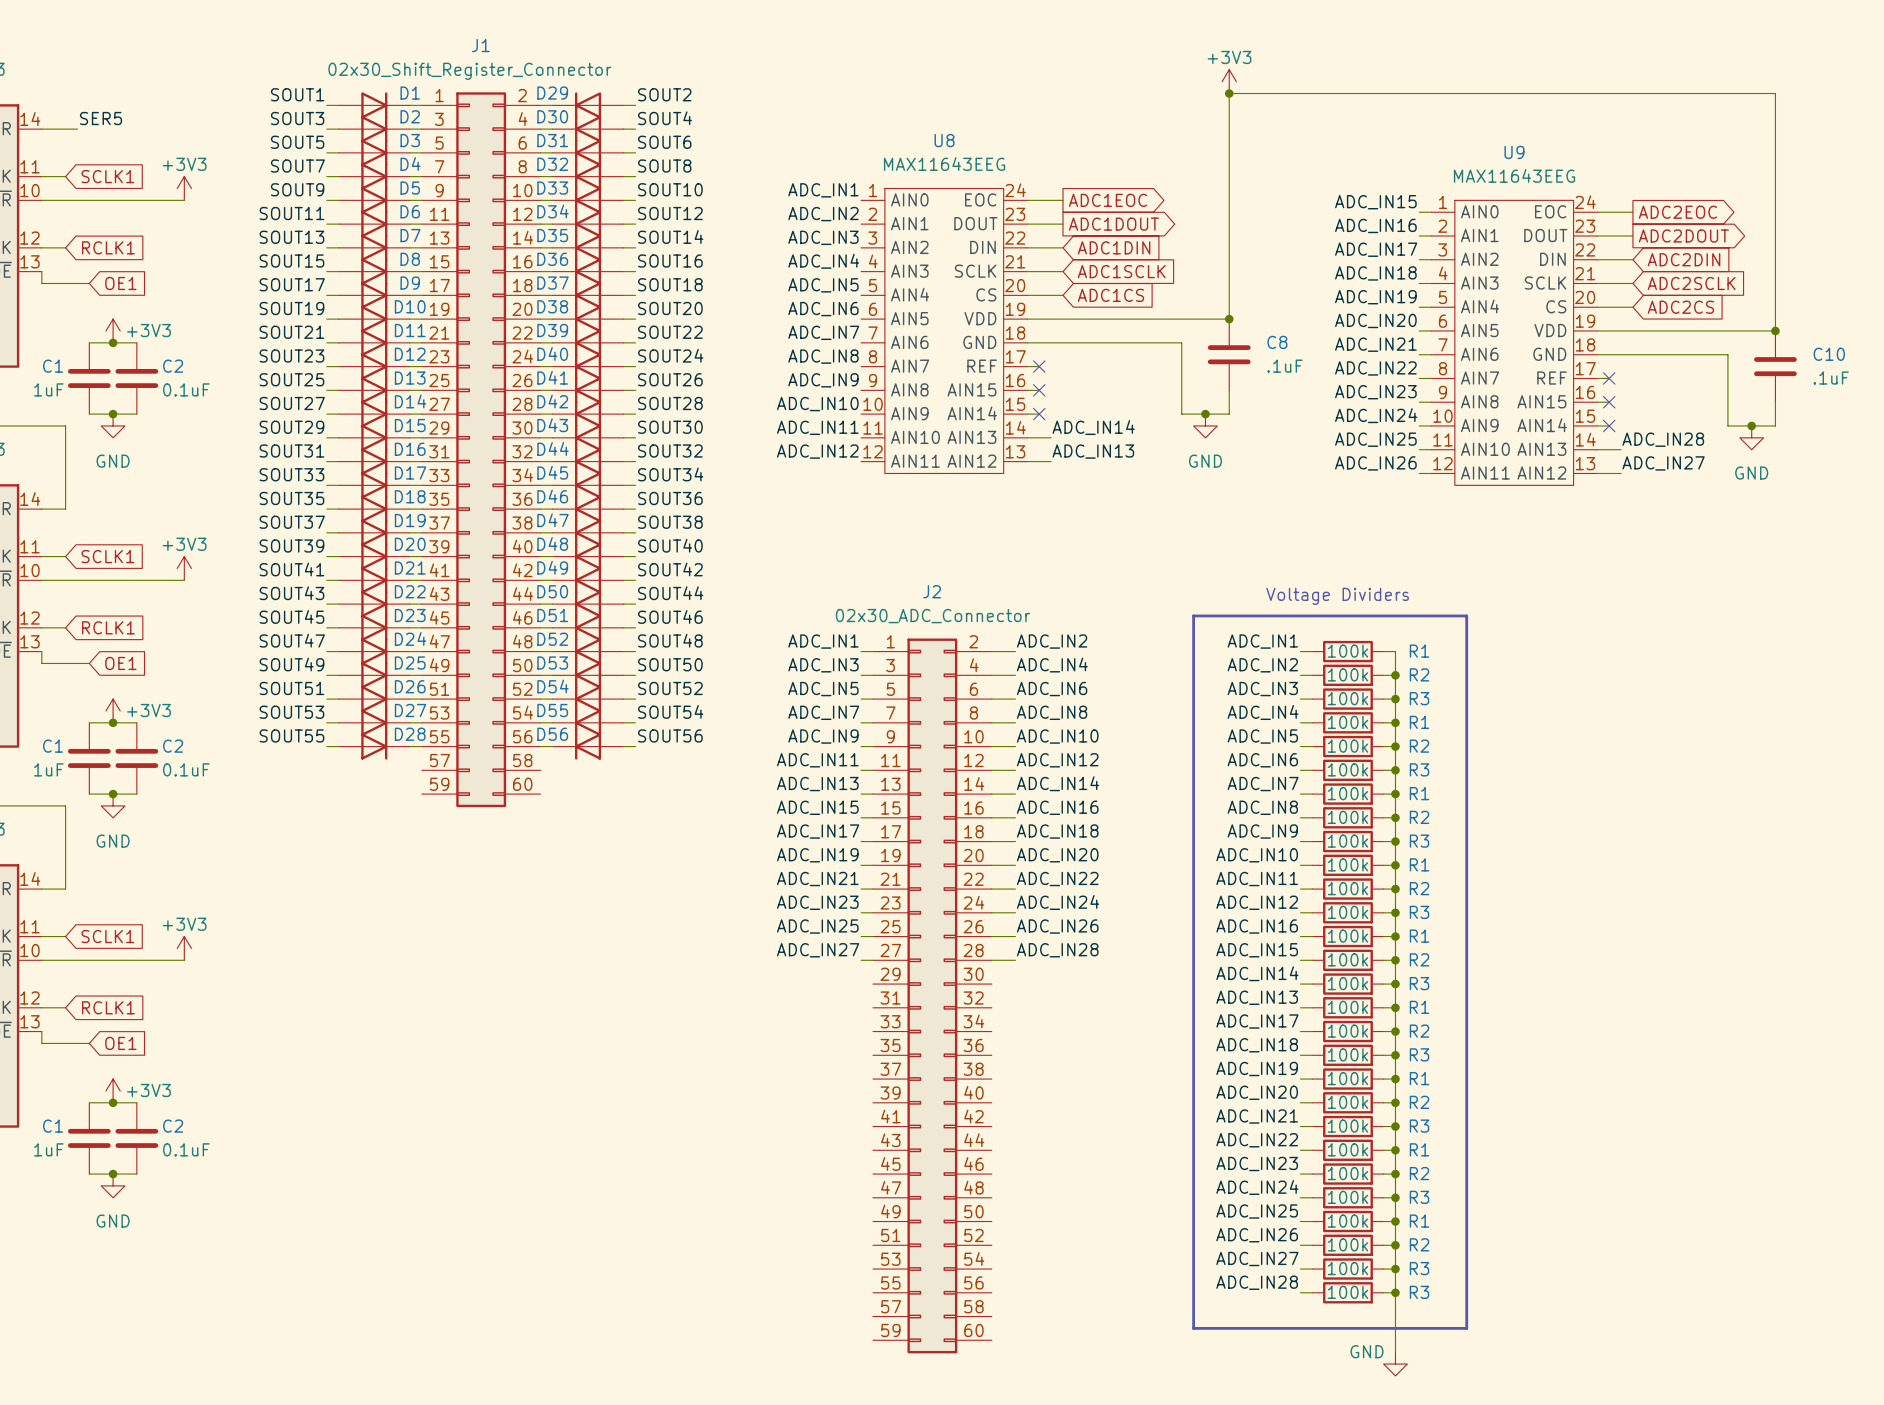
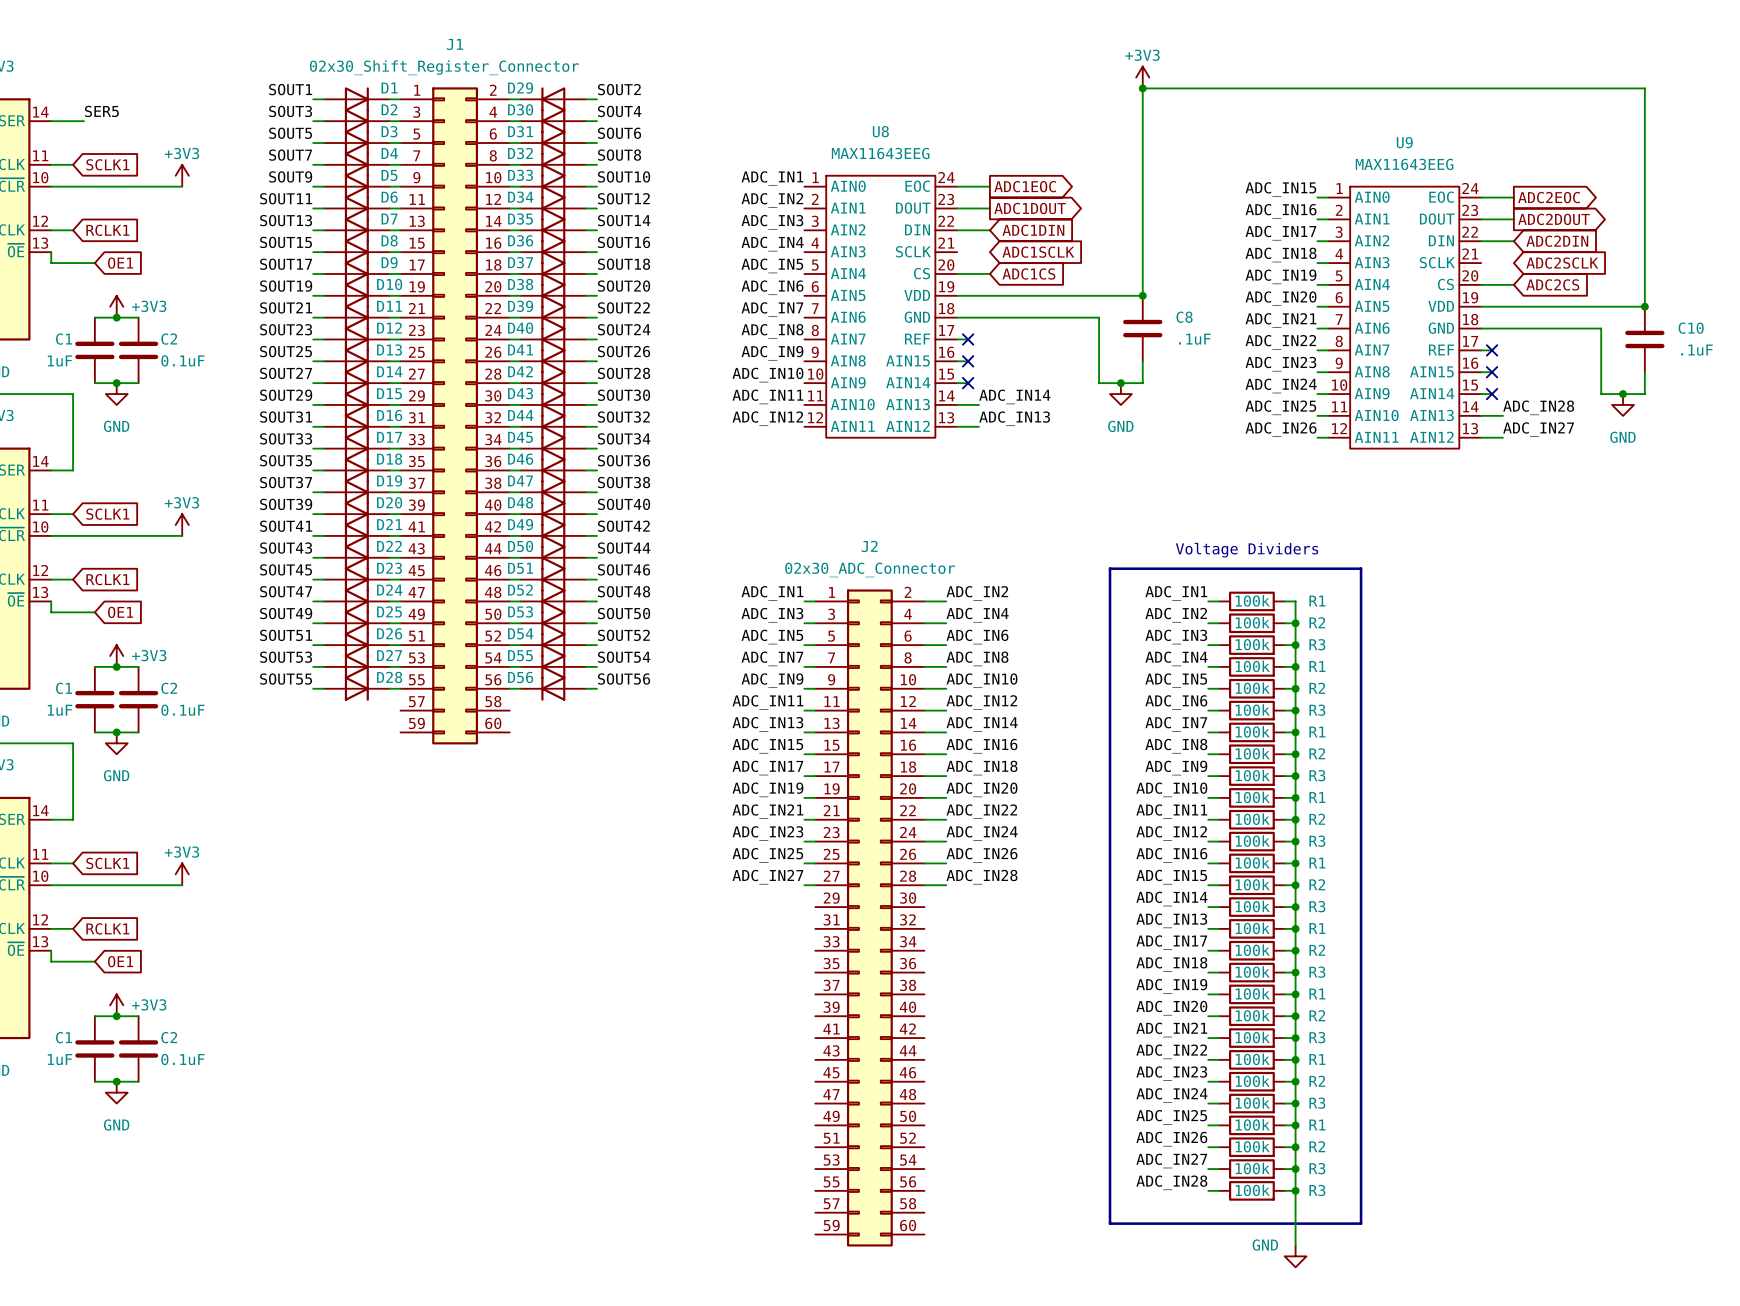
wire: (1027, 271) (1063, 271) -> none
wire: (1597, 283) (1632, 283) -> none

